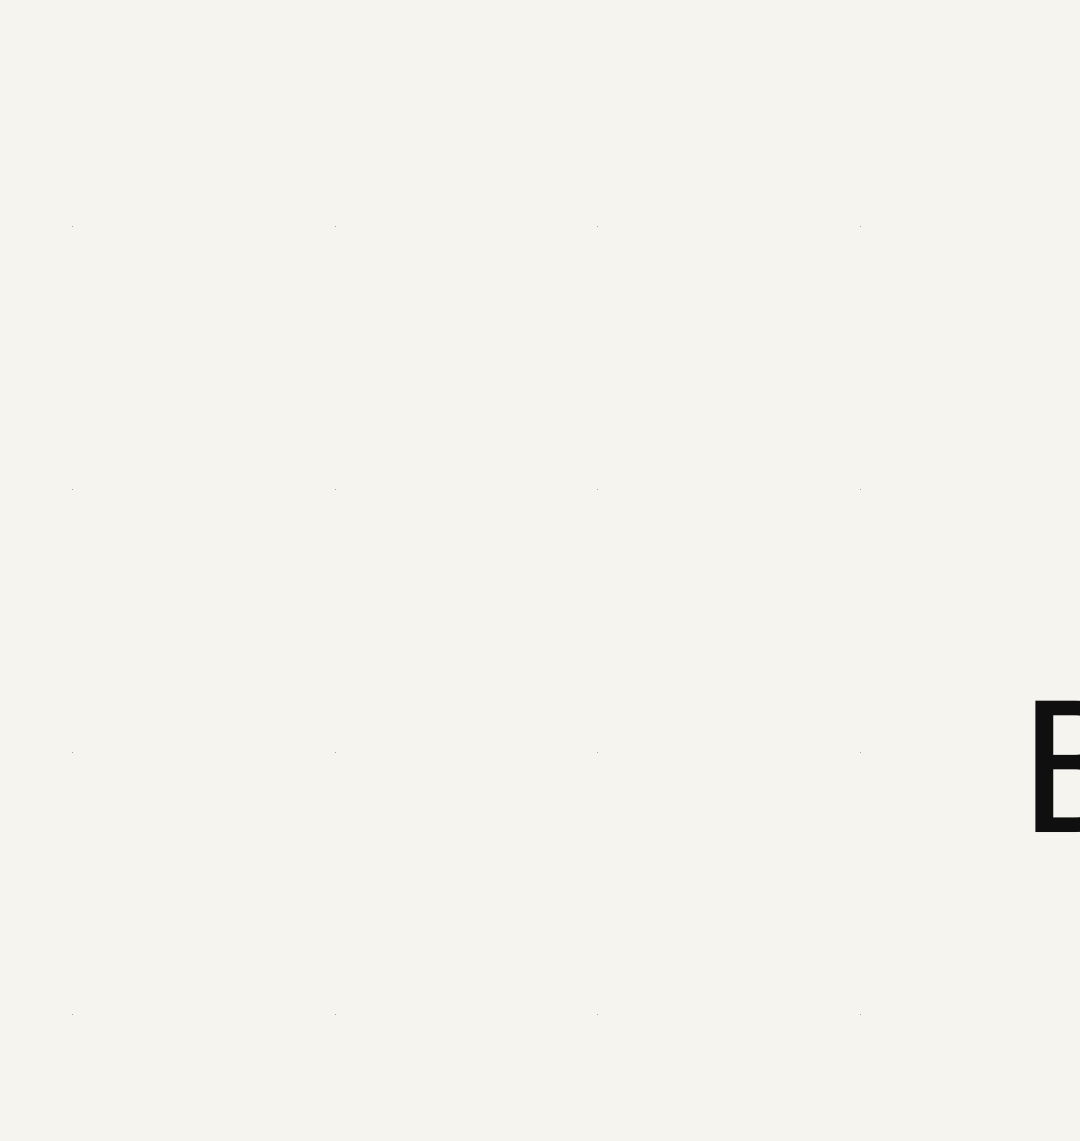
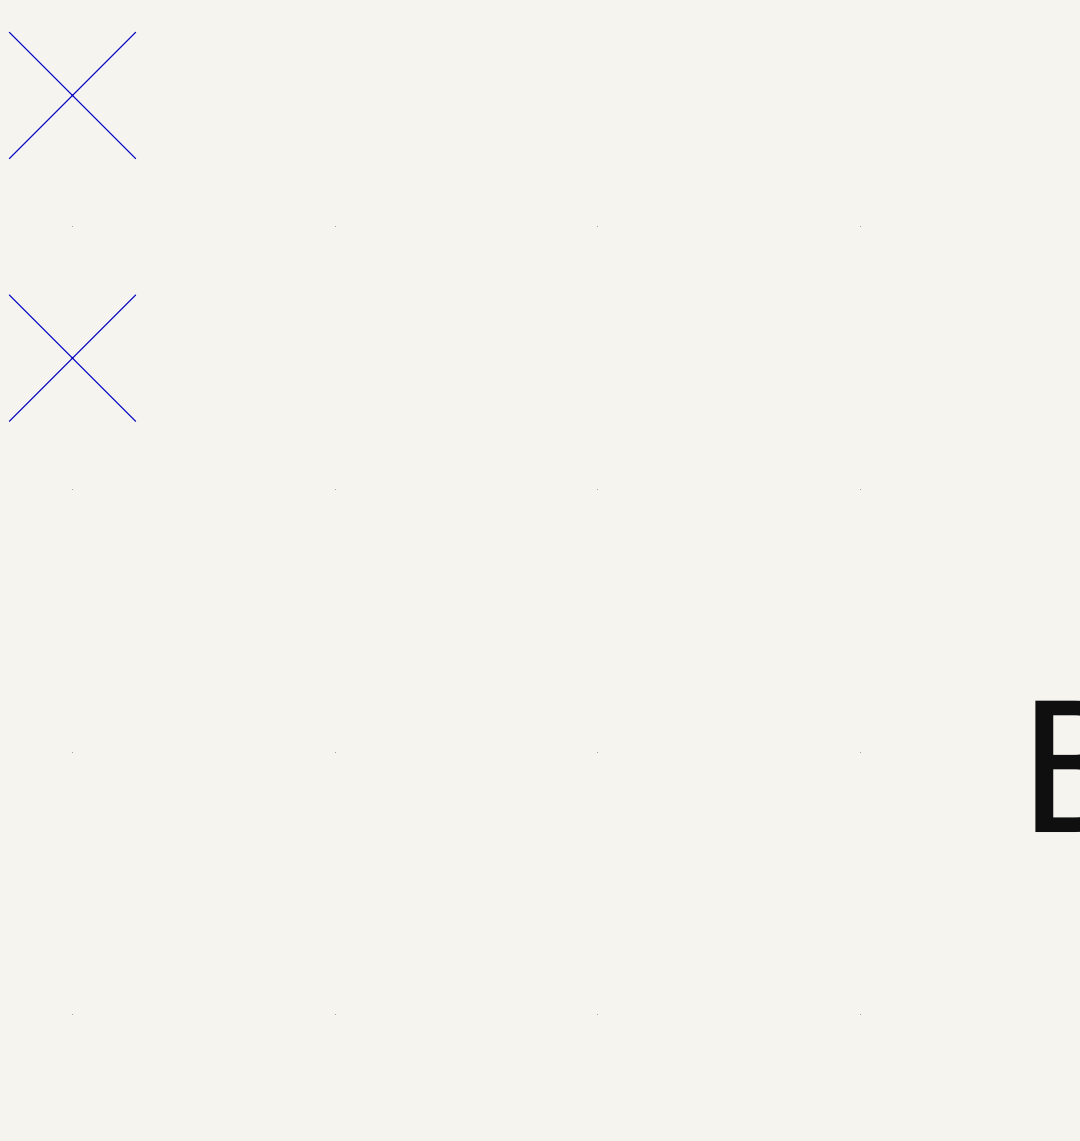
no-connect mark: none -> (72, 95)
no-connect mark: none -> (72, 358)

